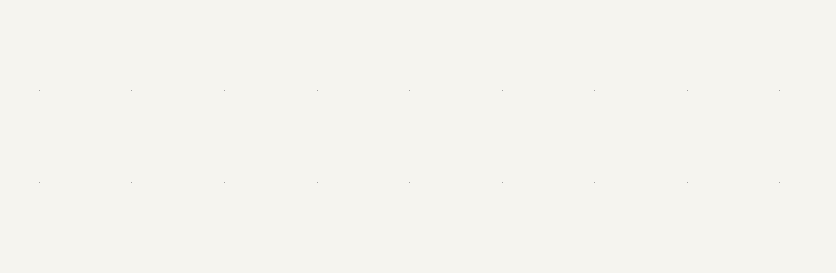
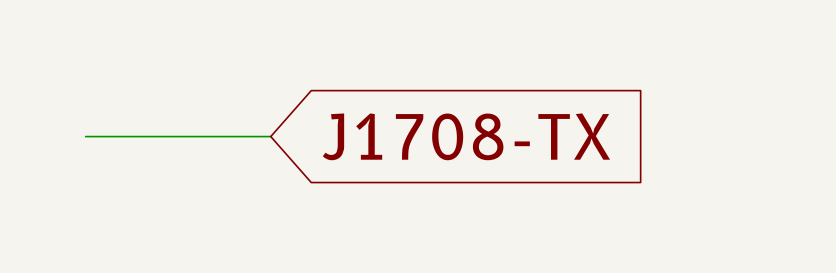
wire: none -> (85, 136) (270, 136)
global label: none -> J1708-TX (466, 136)

